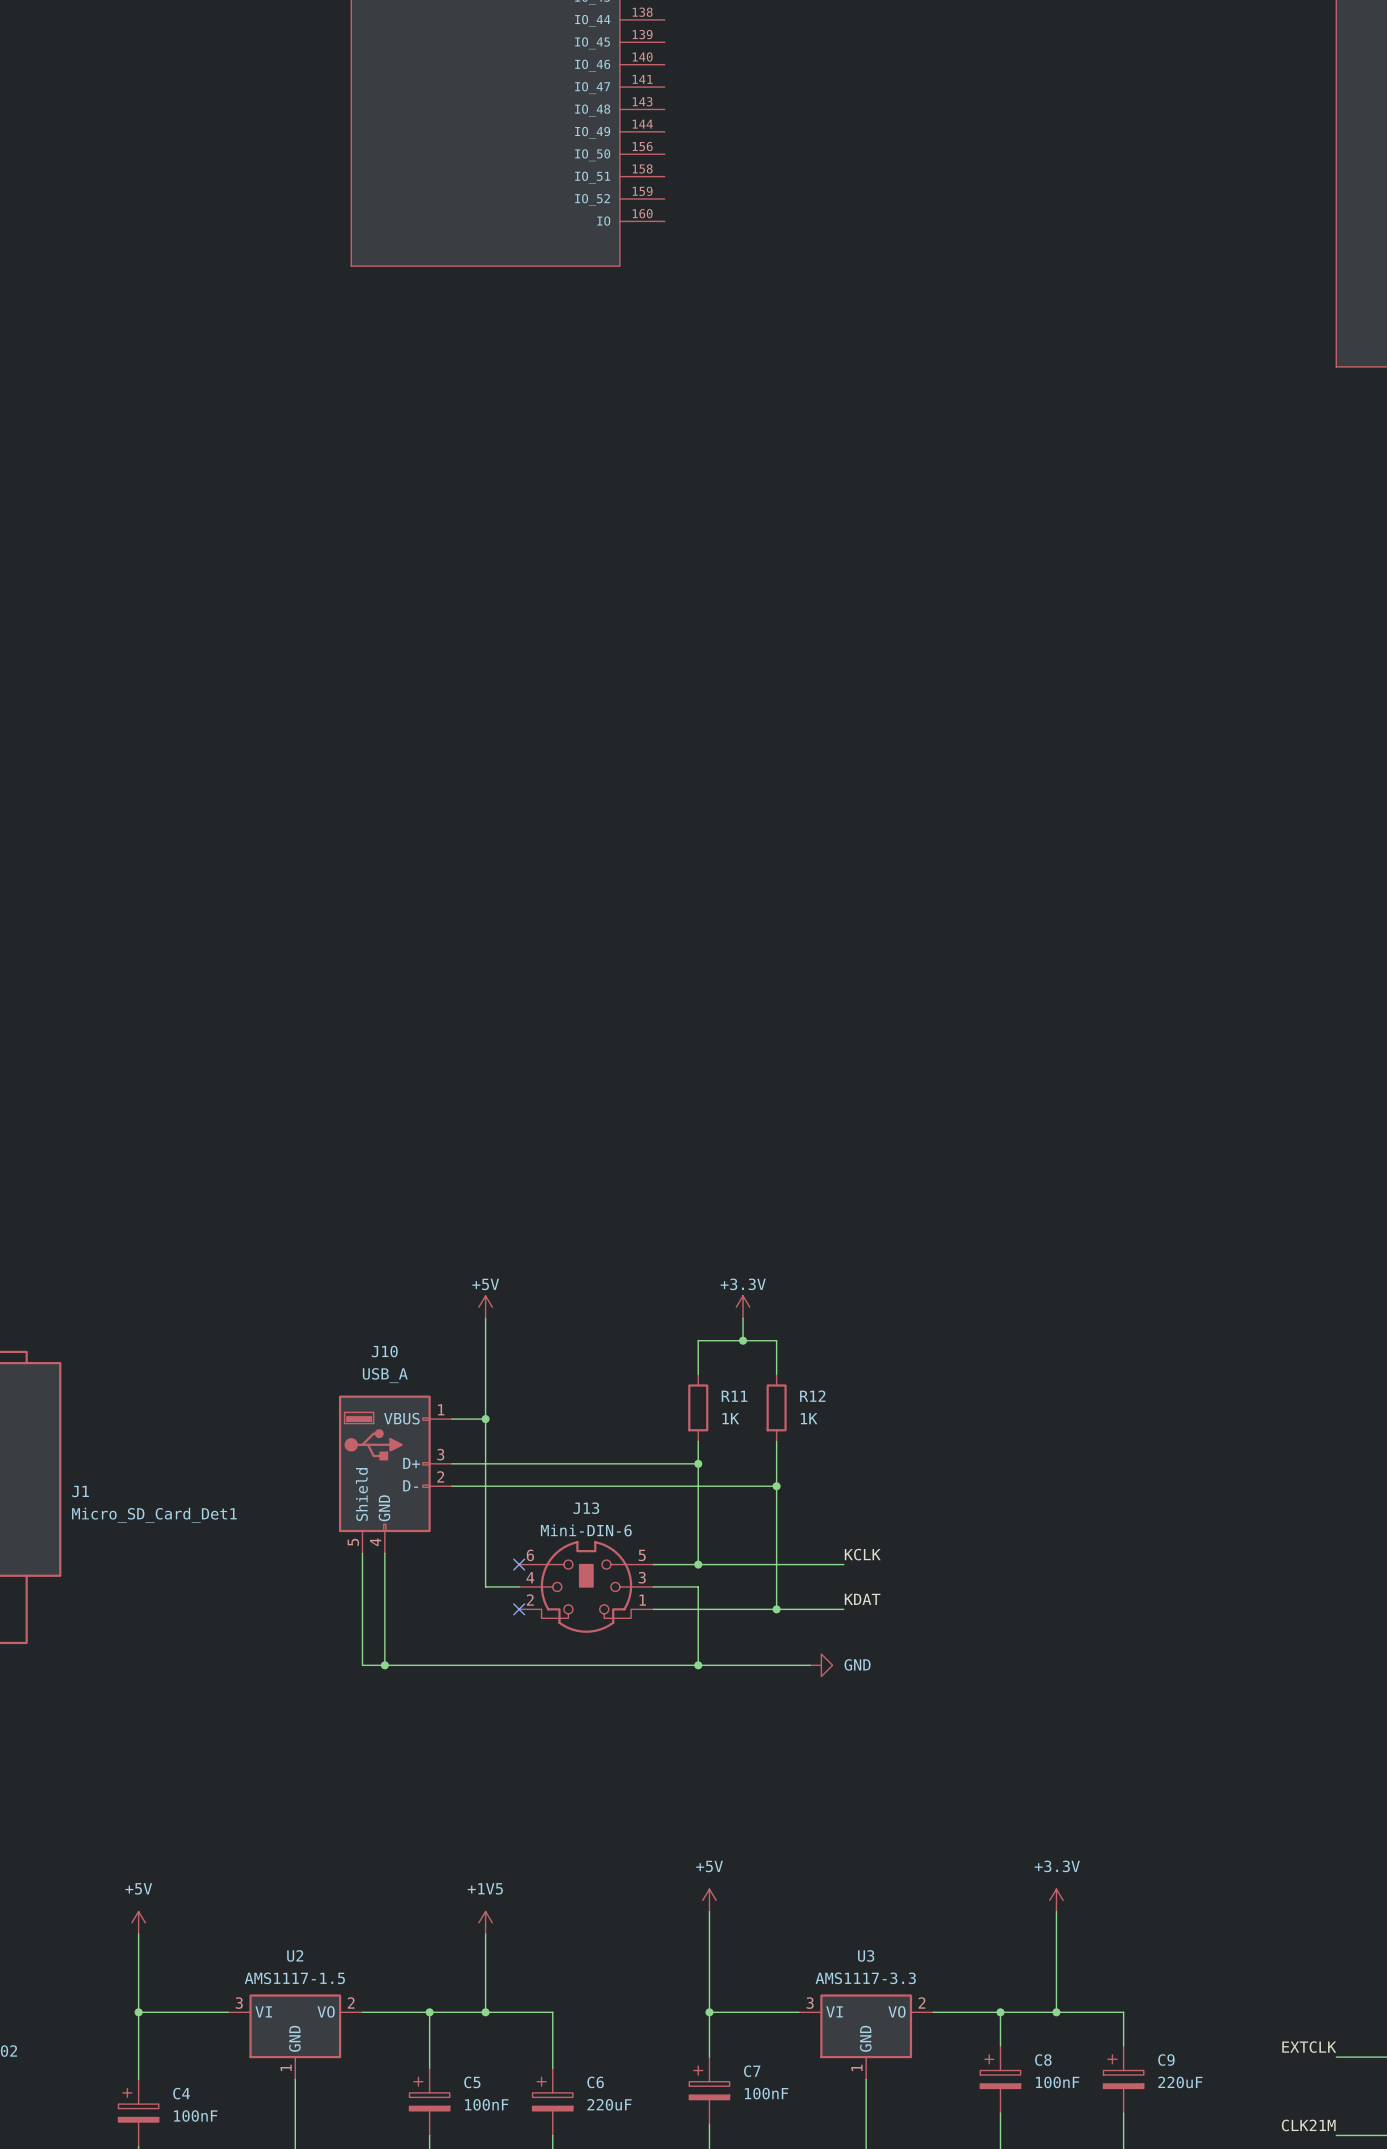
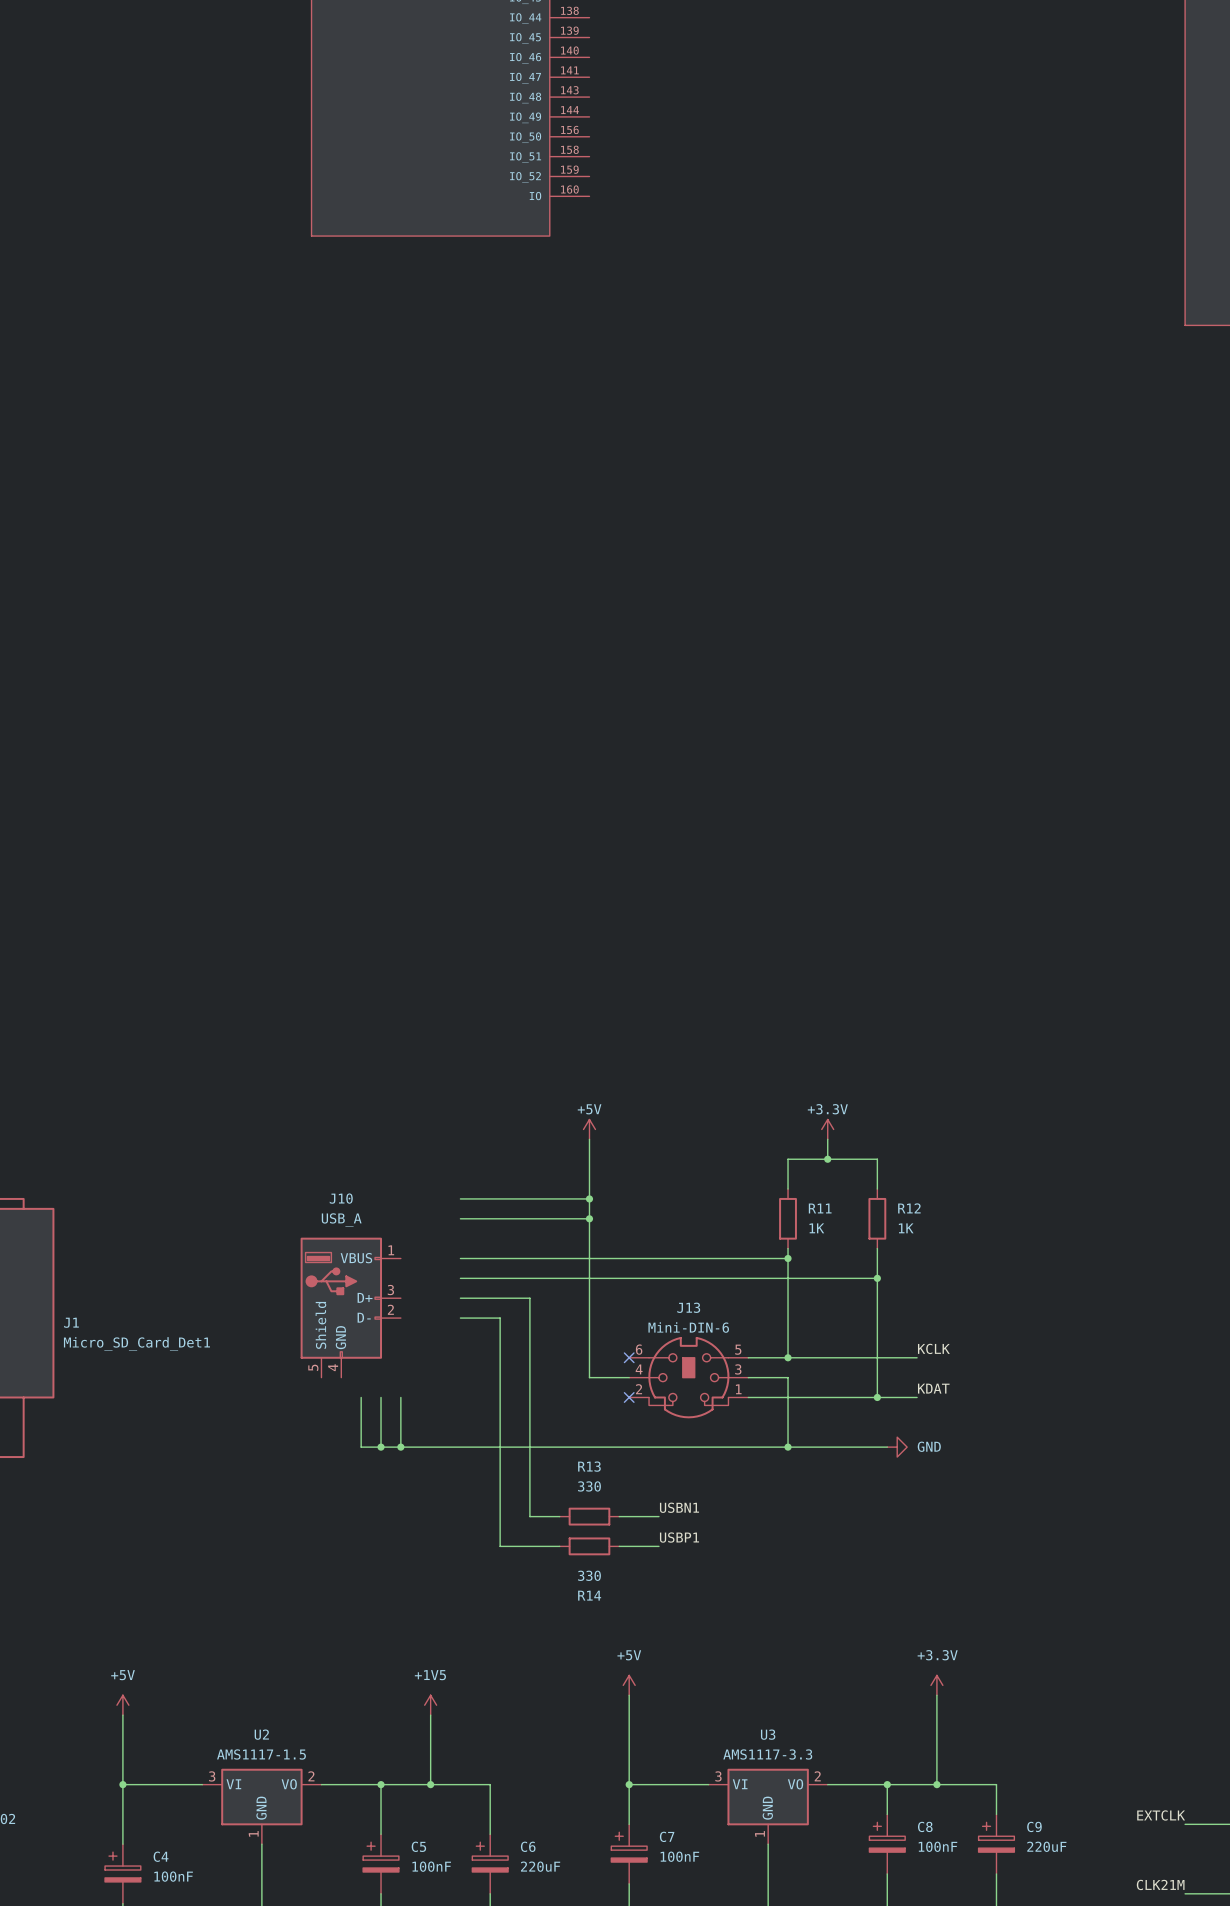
wire: none -> (589, 1139) (589, 1377) (629, 1377)
power symbol position: +5V (485, 1307) -> +5V (589, 1129)
power symbol position: +3.3V (743, 1307) -> +3.3V (827, 1129)
junction: none -> (827, 1159)
wire: (485, 1318) (485, 1586) (519, 1586) -> none
wire: (743, 1318) (743, 1340) -> (827, 1139) (827, 1159)
junction: (743, 1340) -> none
wire: none -> (788, 1189) (788, 1159) (877, 1159) (877, 1189)
wire: none -> (460, 1198) (589, 1198)
junction: none -> (589, 1198)
wire: none -> (460, 1218) (589, 1218)
junction: none -> (589, 1218)
wire: (698, 1374) (698, 1340) (776, 1340) (776, 1374) -> none
R11 position: (698, 1407) -> (788, 1218)
R12 position: (776, 1407) -> (877, 1218)
wire: (452, 1419) (485, 1419) -> none
junction: (485, 1419) -> none
wire: none -> (460, 1258) (788, 1258)
junction: none -> (788, 1258)
wire: none -> (460, 1278) (877, 1278)
wire: (698, 1441) (698, 1564) -> (788, 1248) (788, 1357)
wire: (776, 1441) (776, 1609) -> (877, 1248) (877, 1397)
junction: none -> (877, 1278)
wire: (452, 1463) (519, 1463) -> none
wire: (597, 1463) (698, 1463) -> (529, 1298) (529, 1516) (559, 1516)
junction: (698, 1463) -> none
wire: (452, 1486) (519, 1486) -> none
wire: (563, 1486) (776, 1486) -> (500, 1318) (500, 1546) (559, 1546)
junction: (776, 1486) -> none
no-connect mark: none -> (629, 1357)
junction: none -> (788, 1357)
wire: (362, 1553) (362, 1665) (810, 1665) -> none
wire: (384, 1553) (384, 1665) -> none
label position: KCLK (862, 1554) -> KCLK (933, 1348)
no-connect mark: (519, 1564) -> none
wire: (653, 1564) (843, 1564) -> (748, 1357) (917, 1357)
junction: (698, 1564) -> none
wire: none -> (361, 1397) (361, 1447) (887, 1447)
wire: none -> (381, 1397) (381, 1447)
wire: none -> (400, 1397) (400, 1447)
no-connect mark: none -> (629, 1397)
junction: none -> (877, 1397)
J13 position: (586, 1586) -> (688, 1377)
wire: (653, 1586) (698, 1586) (698, 1665) -> (748, 1377) (788, 1377) (788, 1447)
label position: KDAT (862, 1599) -> KDAT (933, 1388)
no-connect mark: (519, 1609) -> none
wire: (653, 1609) (843, 1609) -> (748, 1397) (917, 1397)
junction: (776, 1609) -> none
junction: none -> (381, 1447)
junction: none -> (400, 1447)
junction: none -> (788, 1447)
junction: (384, 1665) -> none
junction: (698, 1665) -> none
power symbol position: GND (821, 1665) -> GND (897, 1447)
label: none -> USBN1 (679, 1507)
R13: none -> 330 (589, 1516)
wire: none -> (619, 1516) (658, 1516)
label: none -> USBP1 (679, 1537)
R14: none -> 330 (589, 1546)
wire: none -> (619, 1546) (658, 1546)

